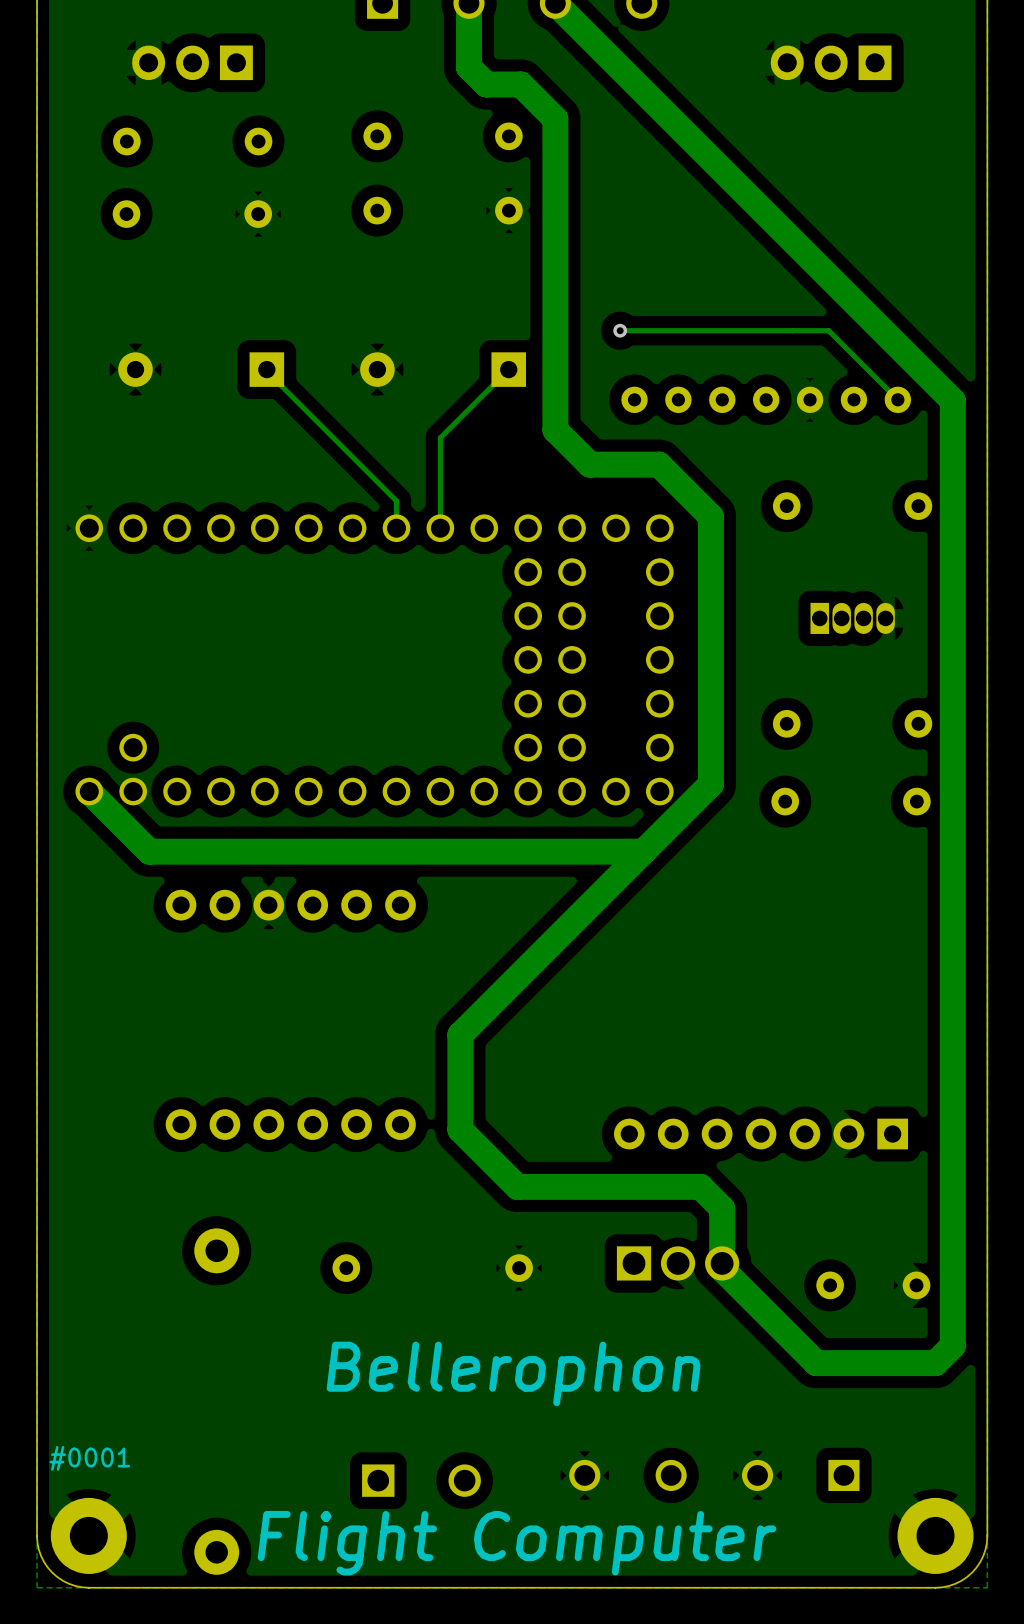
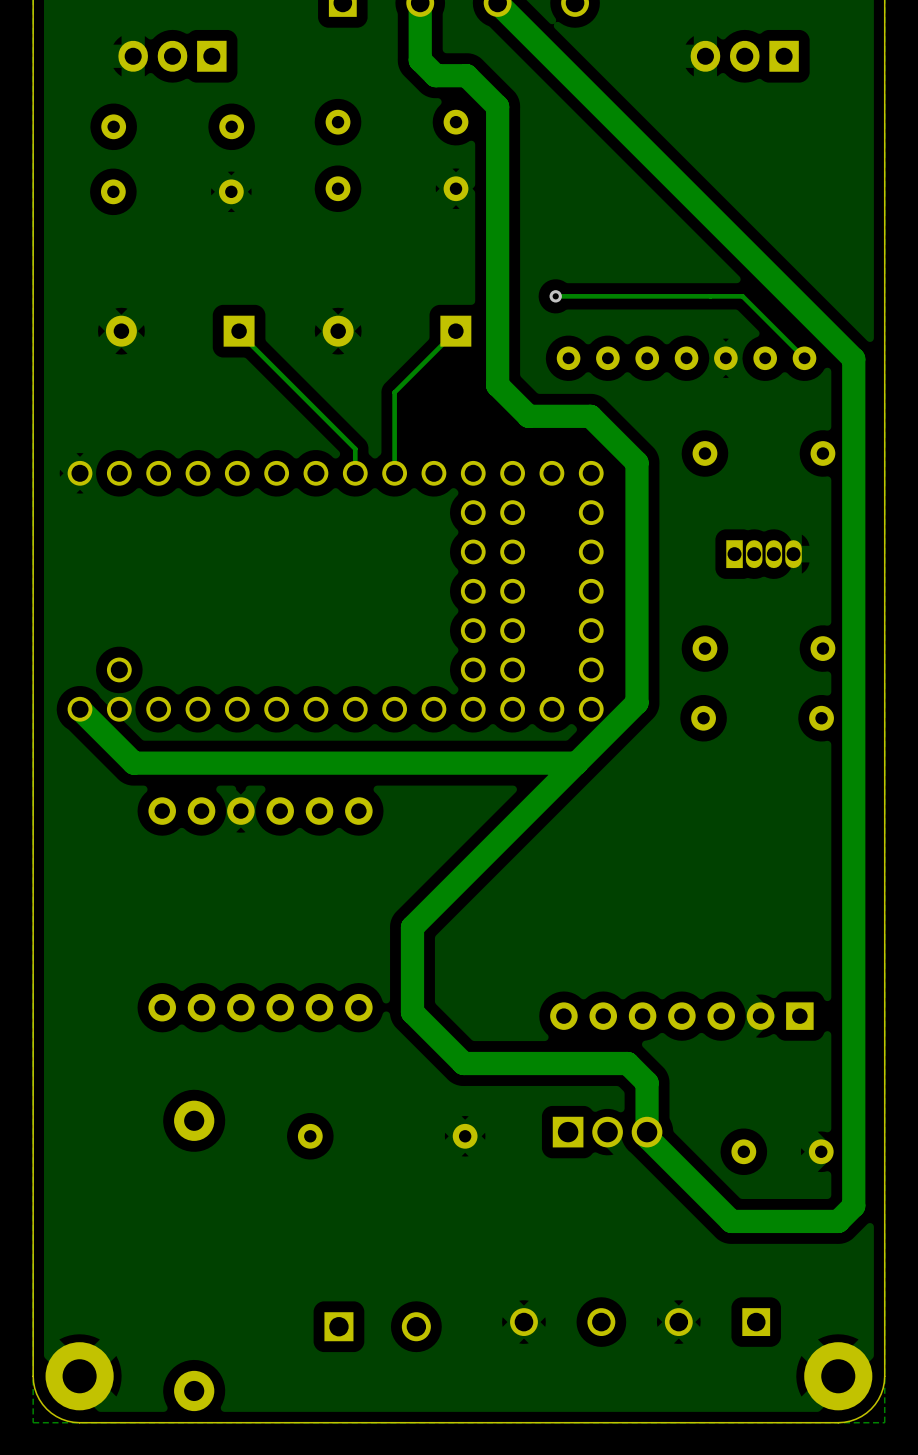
text: Bellerophon (513, 1373) -> none
text: #0001 (89, 1458) -> none
text: Flight Computer (517, 1543) -> none

